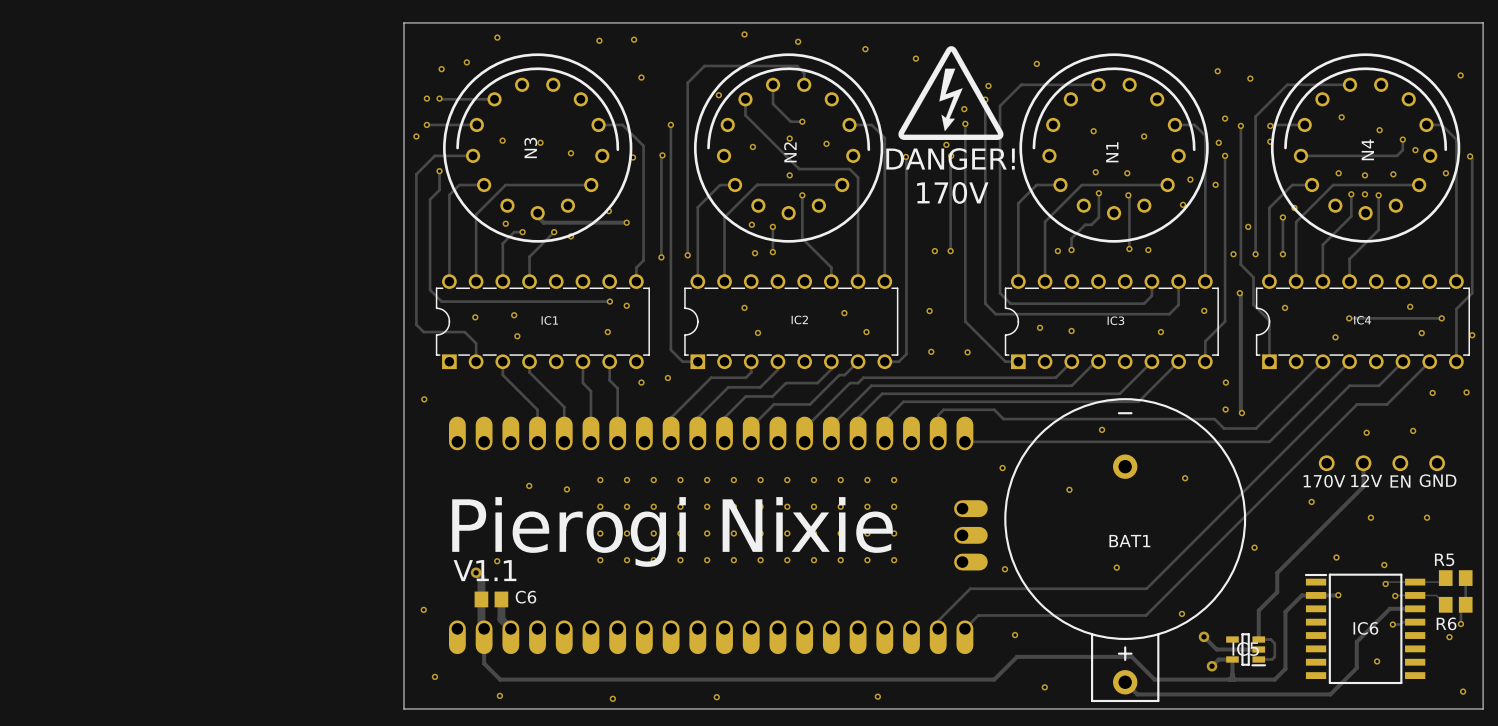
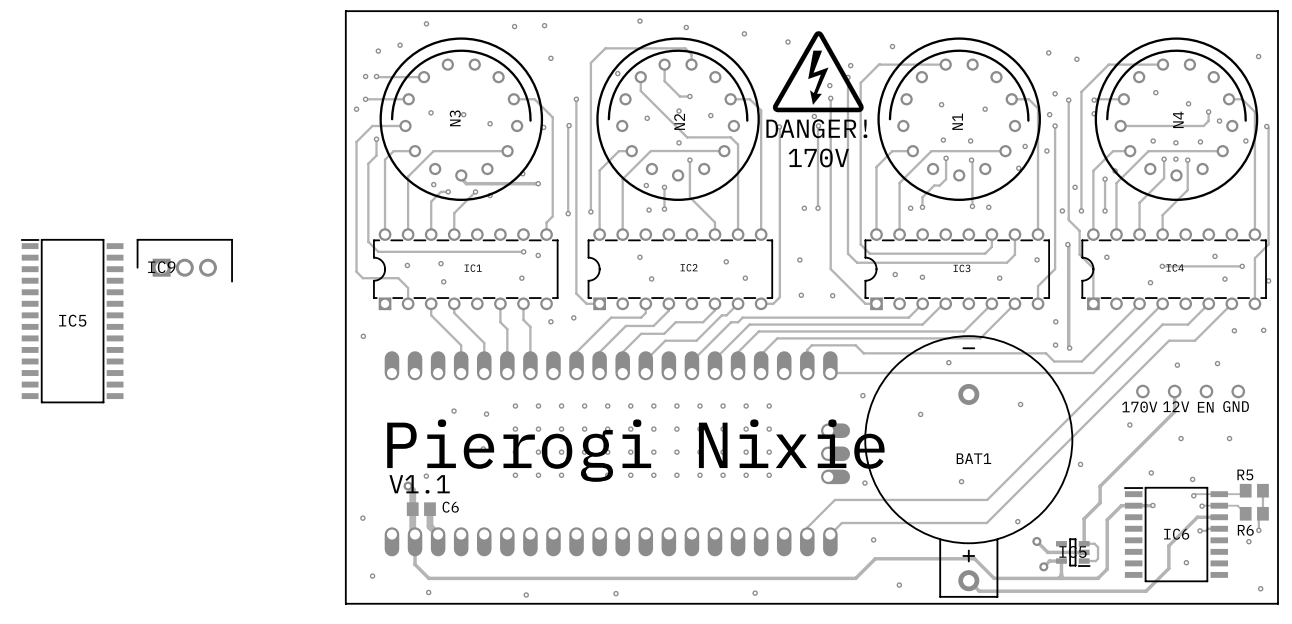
IC9: none -> (184, 260)
IC5: none -> (72, 321)

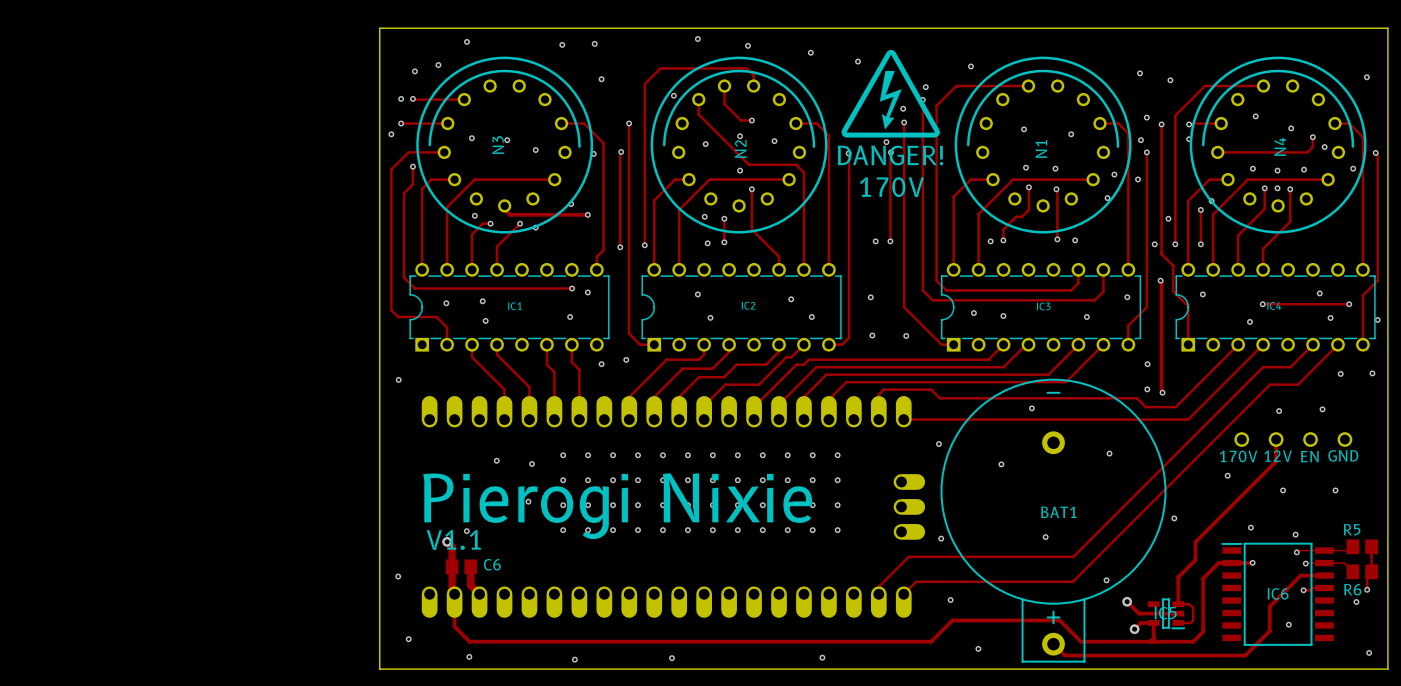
IC9: (184, 260) -> none
IC5: (72, 321) -> none

